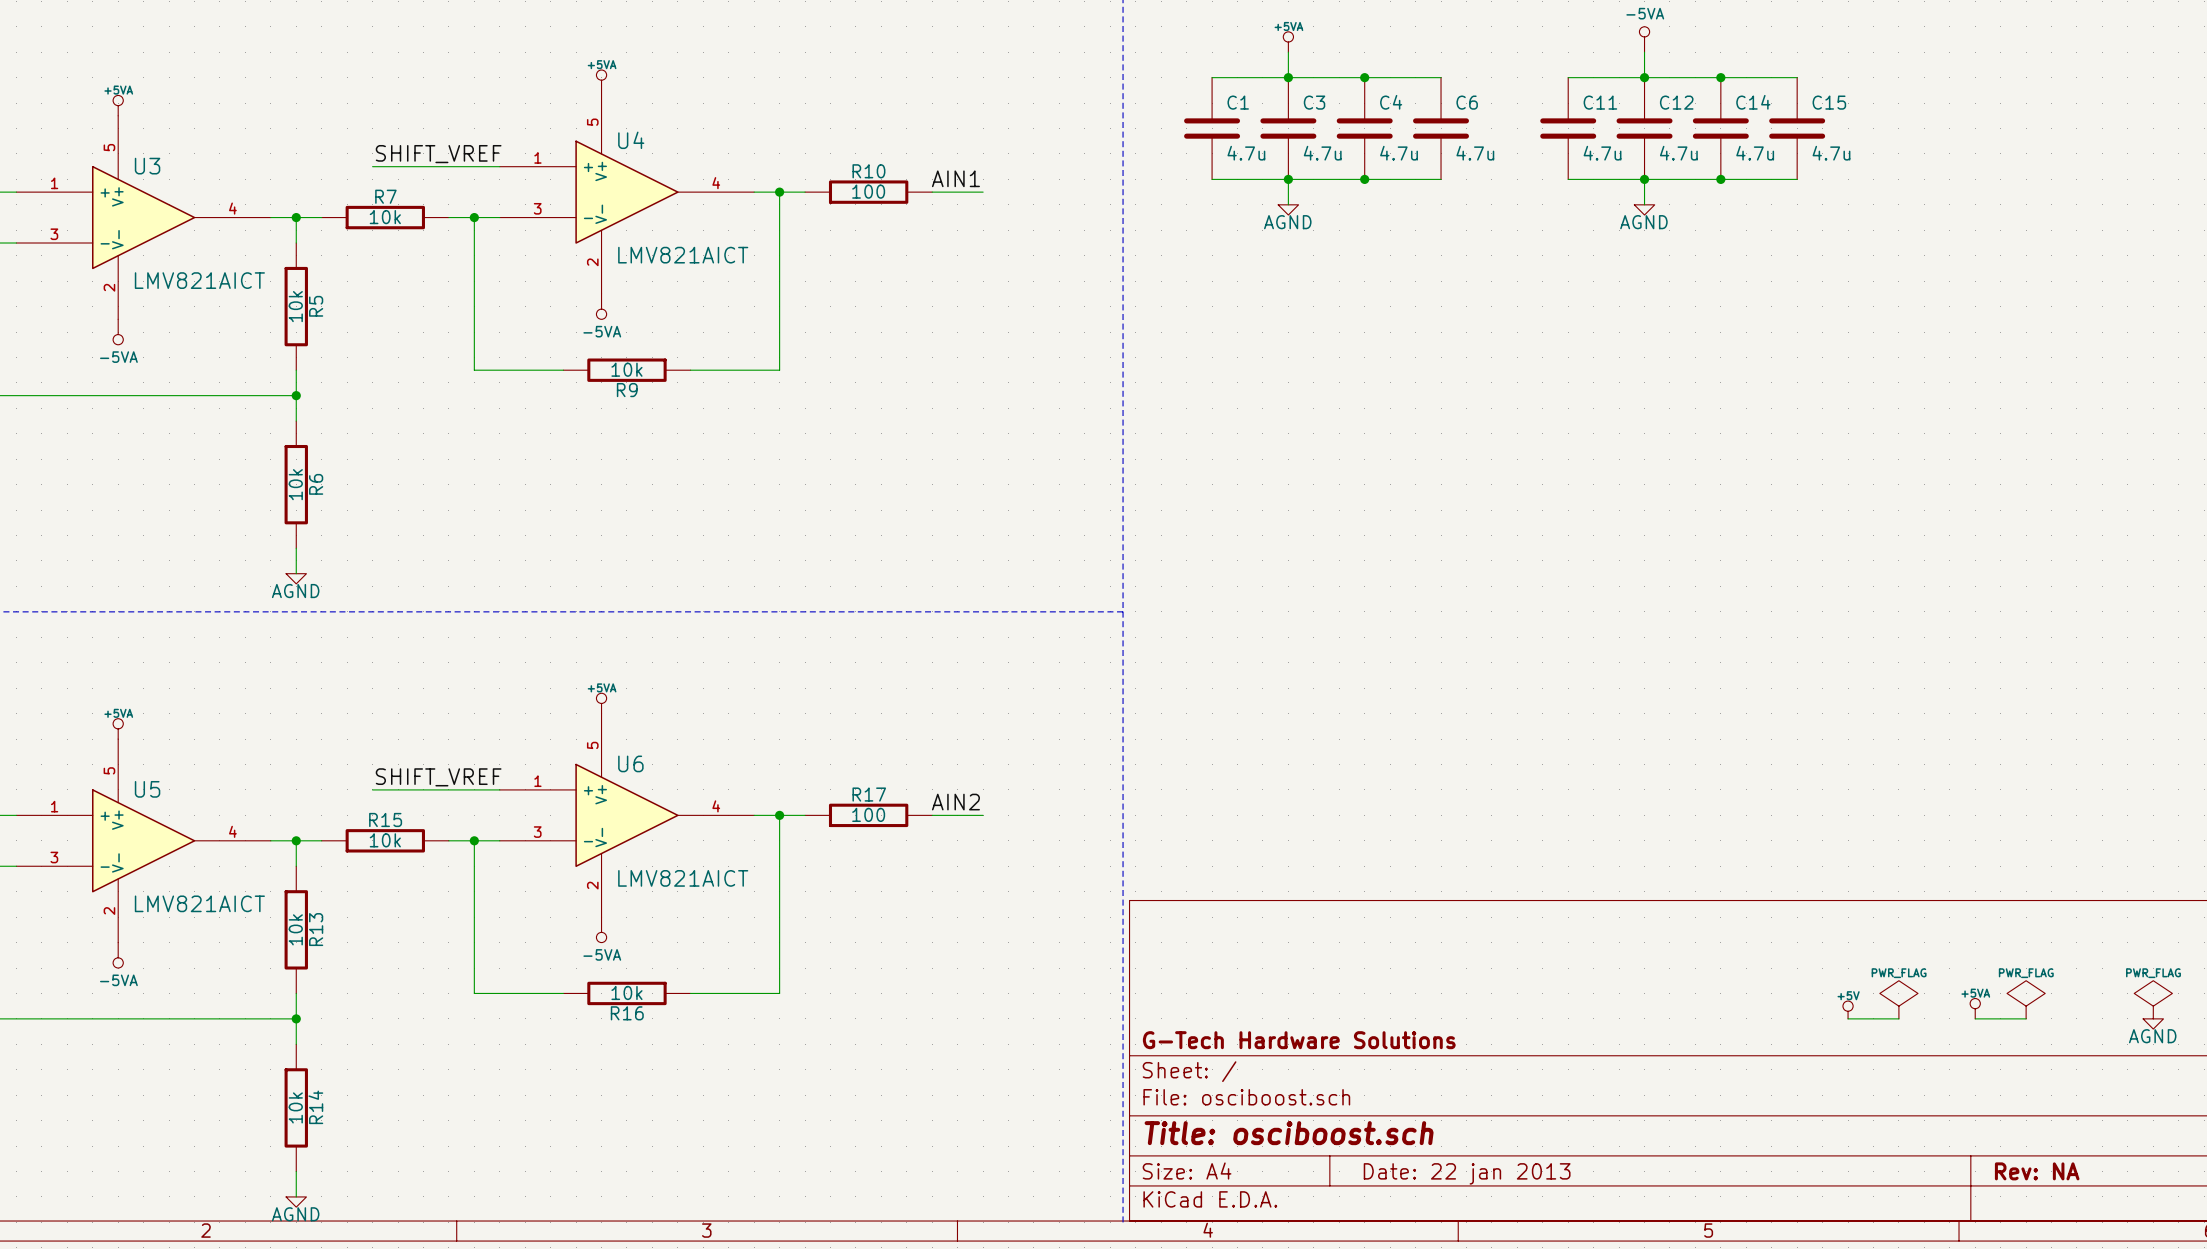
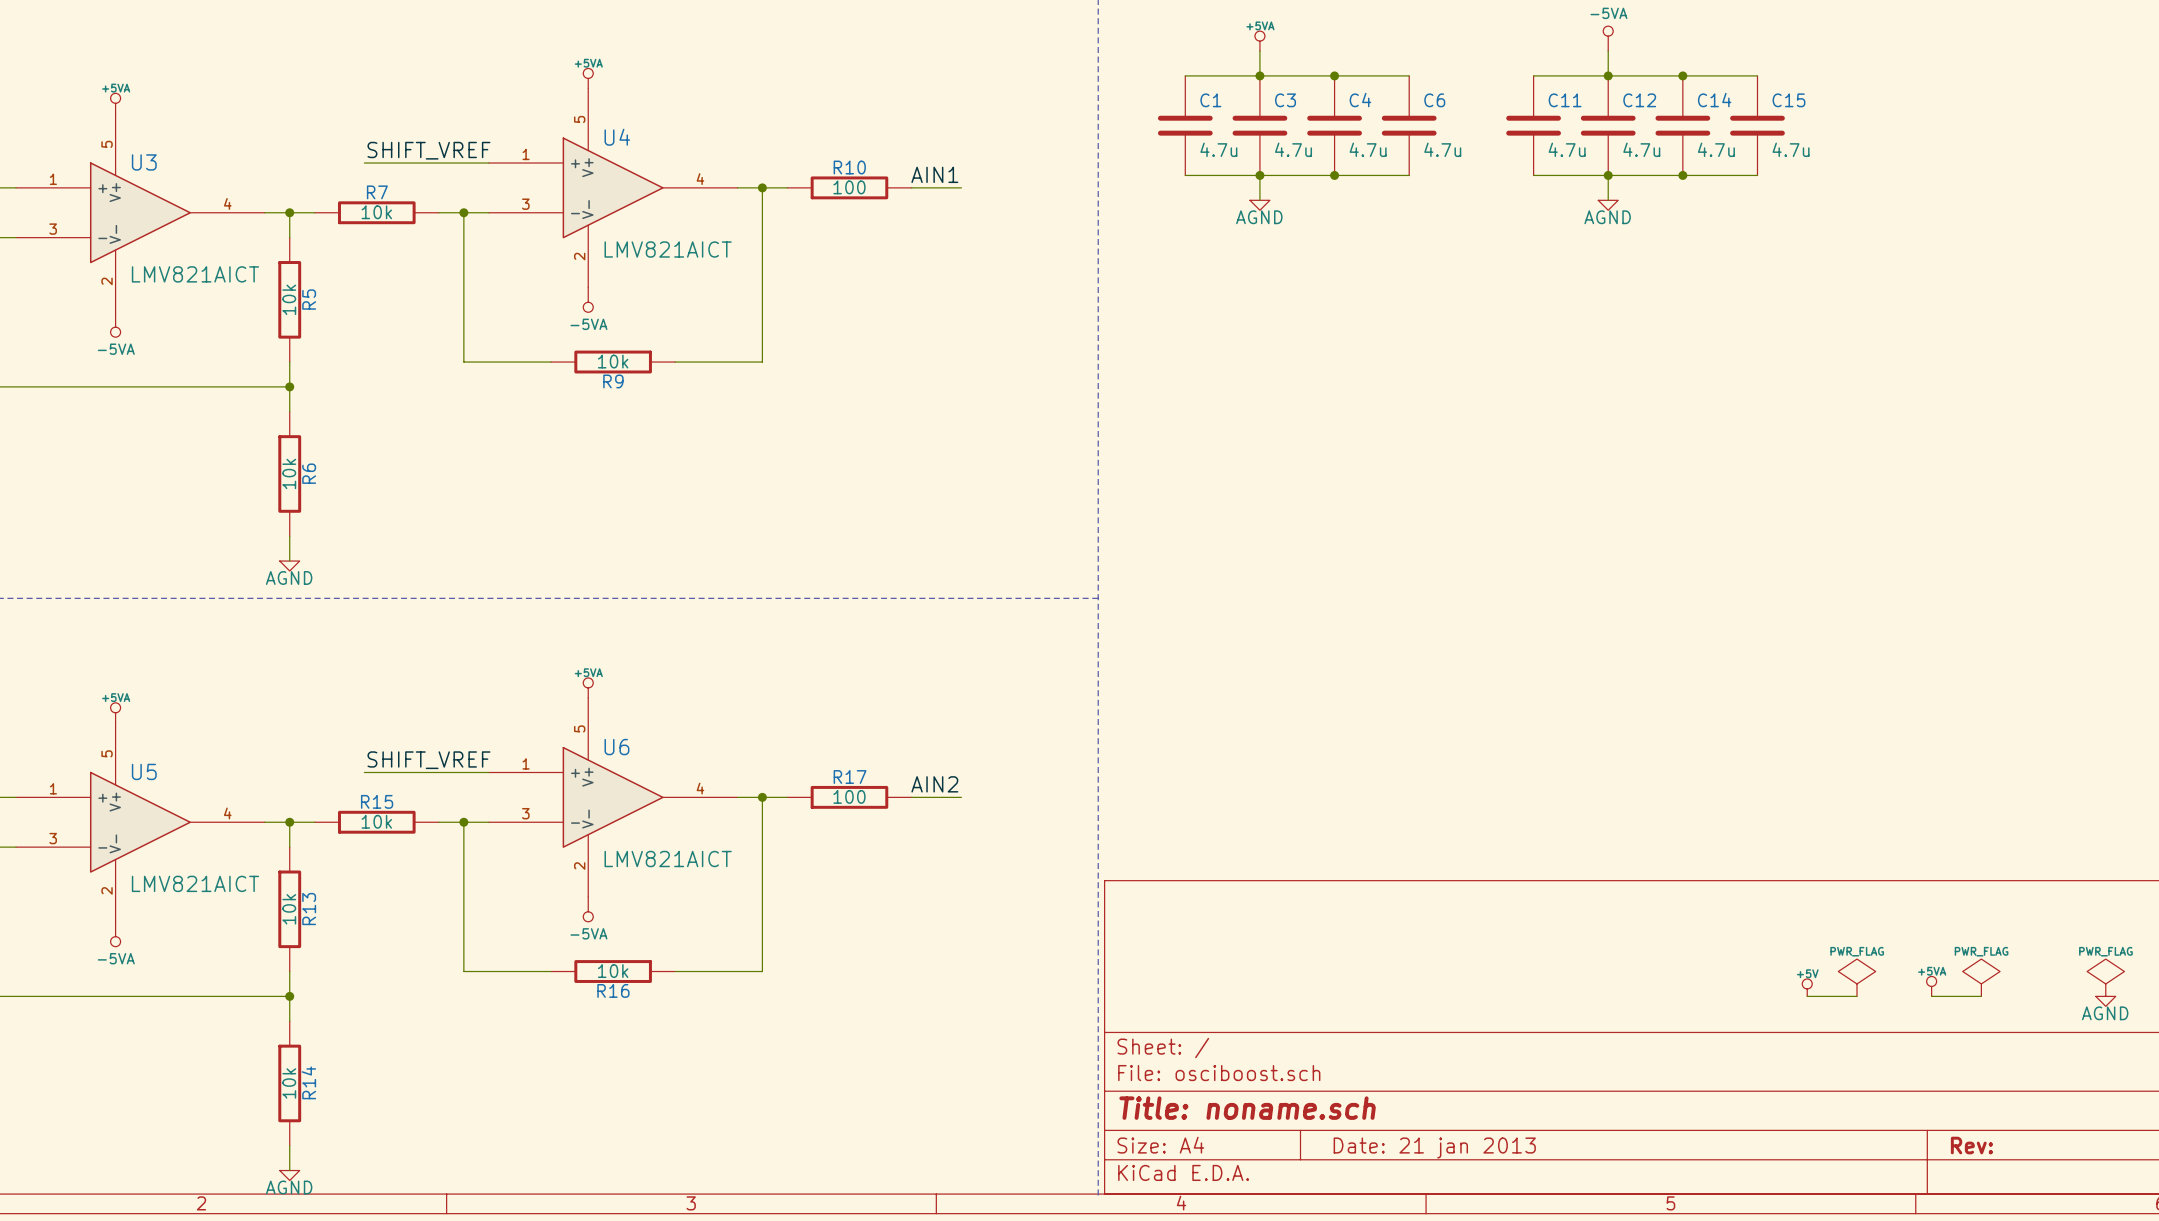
title block: G-Tech Hardware Solutions (1299, 1040) -> none
title block: Title: osciboost.sch (1289, 1133) -> Title: noname.sch (1247, 1108)
title block: Rev: NA (2037, 1171) -> Rev: (1971, 1145)
title block: Date: 22 jan 2013 (1467, 1173) -> Date: 21 jan 2013 (1434, 1147)

